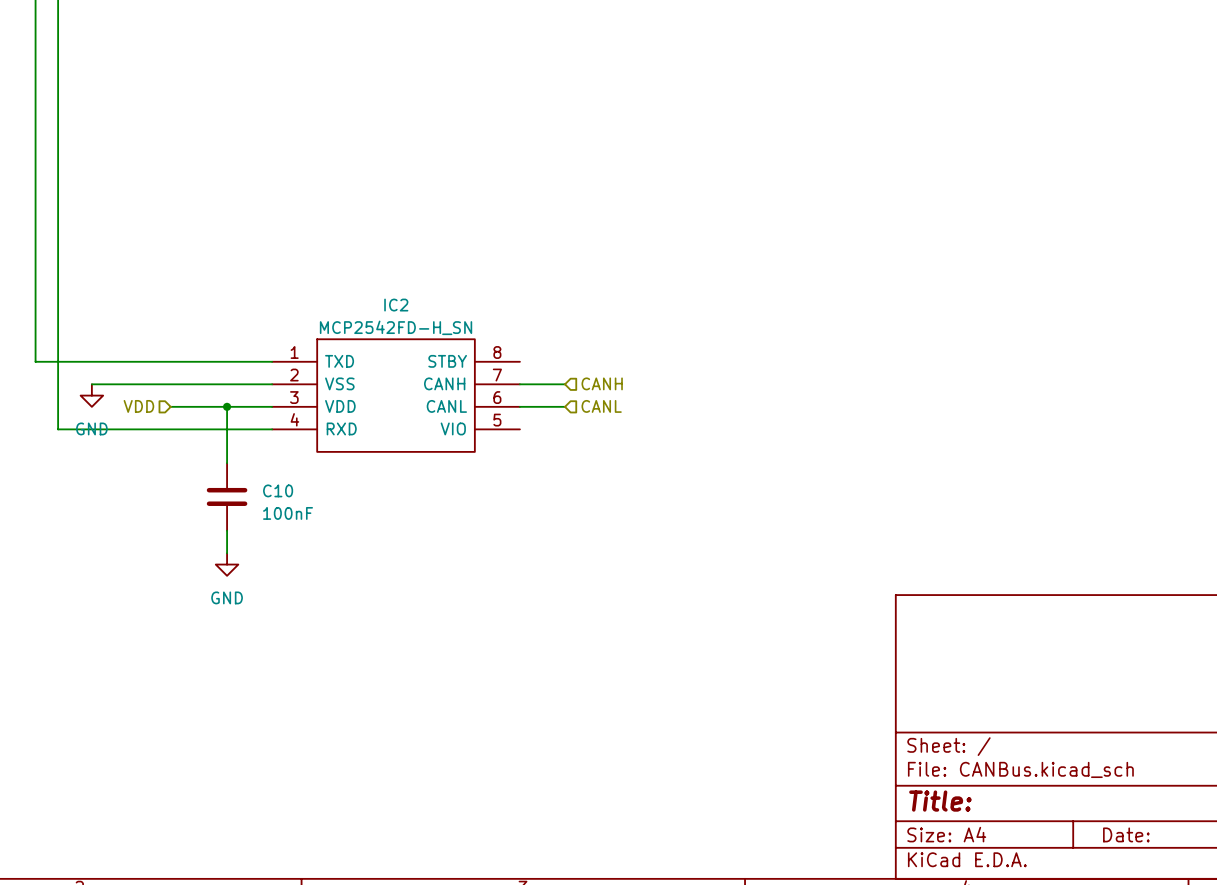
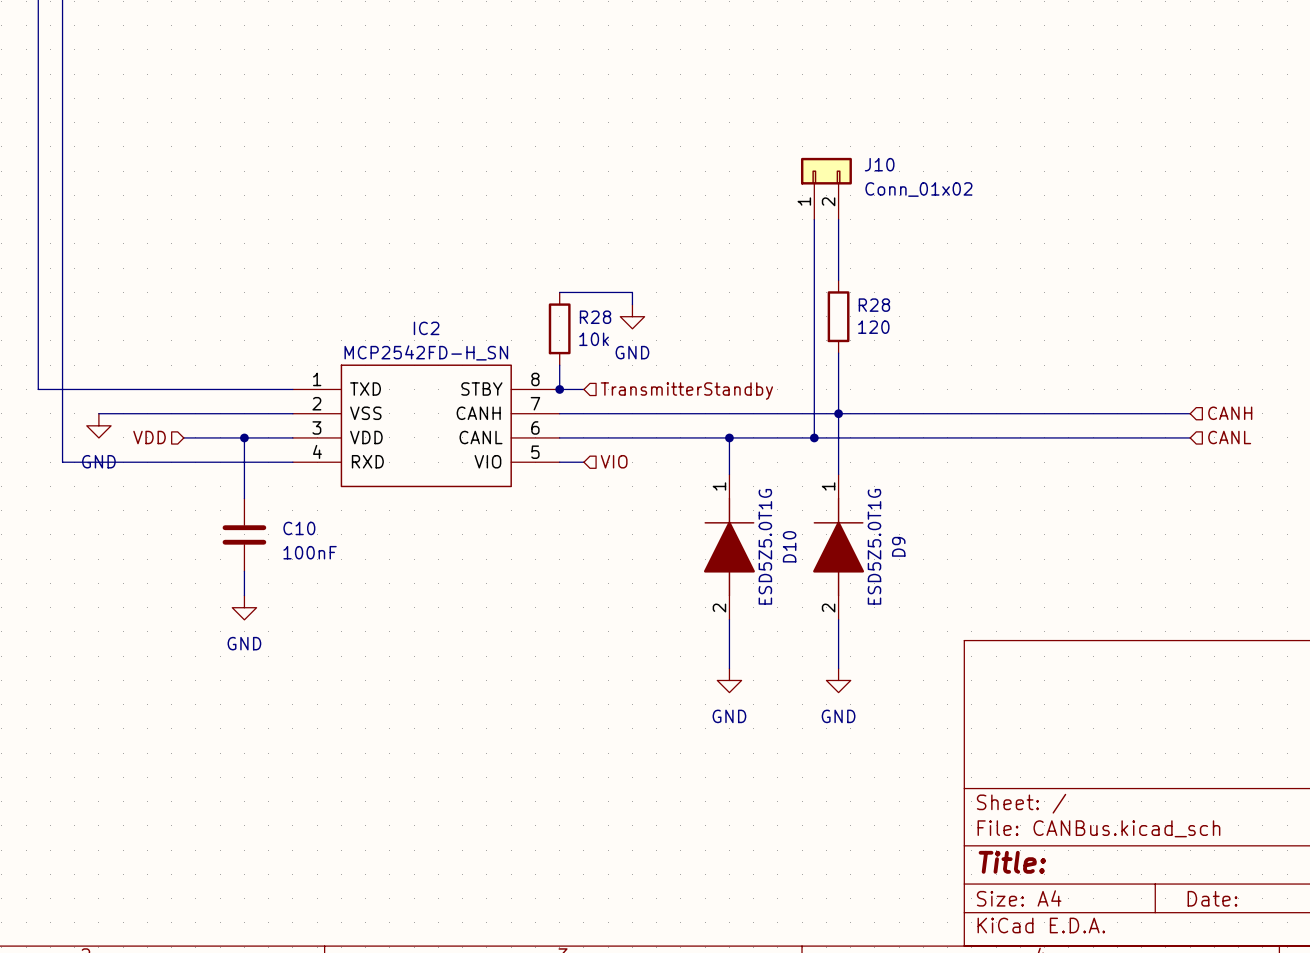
J10: none -> Conn_01x02 (826, 188)
wire: none -> (814, 219) (814, 437)
wire: none -> (838, 219) (838, 280)
wire: none -> (559, 292) (632, 292) (632, 304)
power symbol: none -> GND (632, 316)
R28: none -> 120 (838, 316)
R28: none -> 10k (559, 328)
wire: none -> (838, 353) (838, 474)
wire: none -> (559, 365) (559, 389) (583, 389)
junction: none -> (559, 389)
hierarchical label: none -> TransmitterStandby (686, 391)
hierarchical label: CANH (602, 383) -> none
hierarchical label: none -> CANH (1230, 413)
wire: none -> (608, 413) (1190, 413)
junction: none -> (838, 413)
wire: none -> (608, 437) (1190, 437)
hierarchical label: CANL (601, 406) -> none
wire: none -> (729, 437) (729, 474)
junction: none -> (729, 437)
junction: none -> (814, 437)
hierarchical label: none -> CANL (1229, 437)
hierarchical label: none -> VIO (614, 461)
wire: none -> (559, 462) (583, 462)
D10: none -> ESD5Z5.0T1G (729, 547)
D9: none -> ESD5Z5.0T1G (838, 547)
wire: none -> (729, 619) (729, 668)
wire: none -> (838, 619) (838, 668)
power symbol: none -> GND (729, 680)
power symbol: none -> GND (838, 680)

